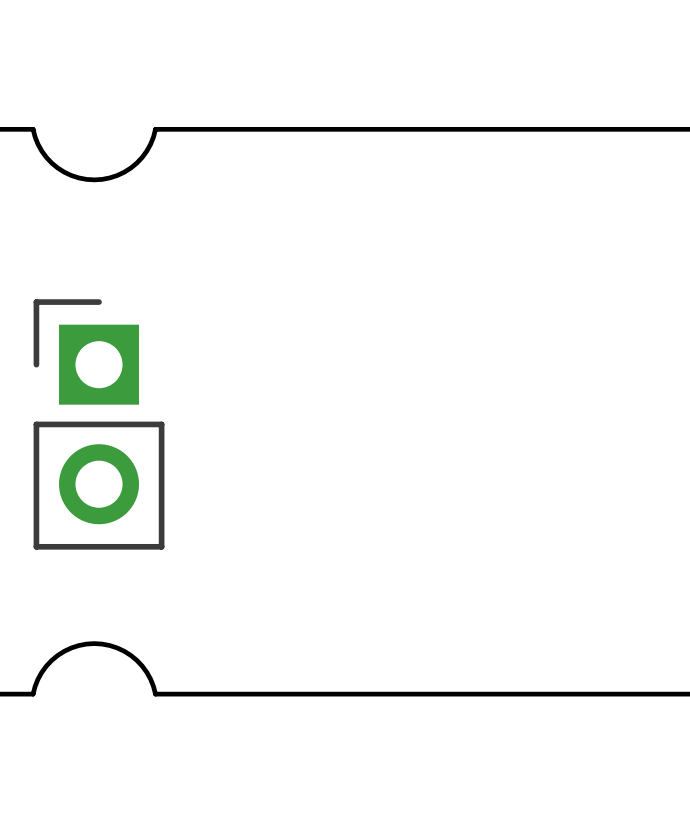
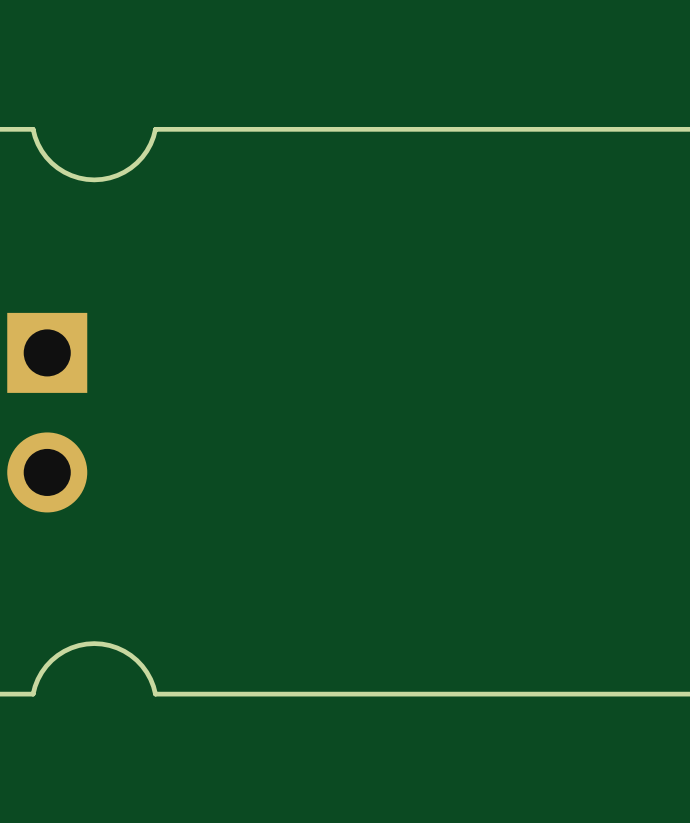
part side: bottom (99, 424) -> top (47, 412)

